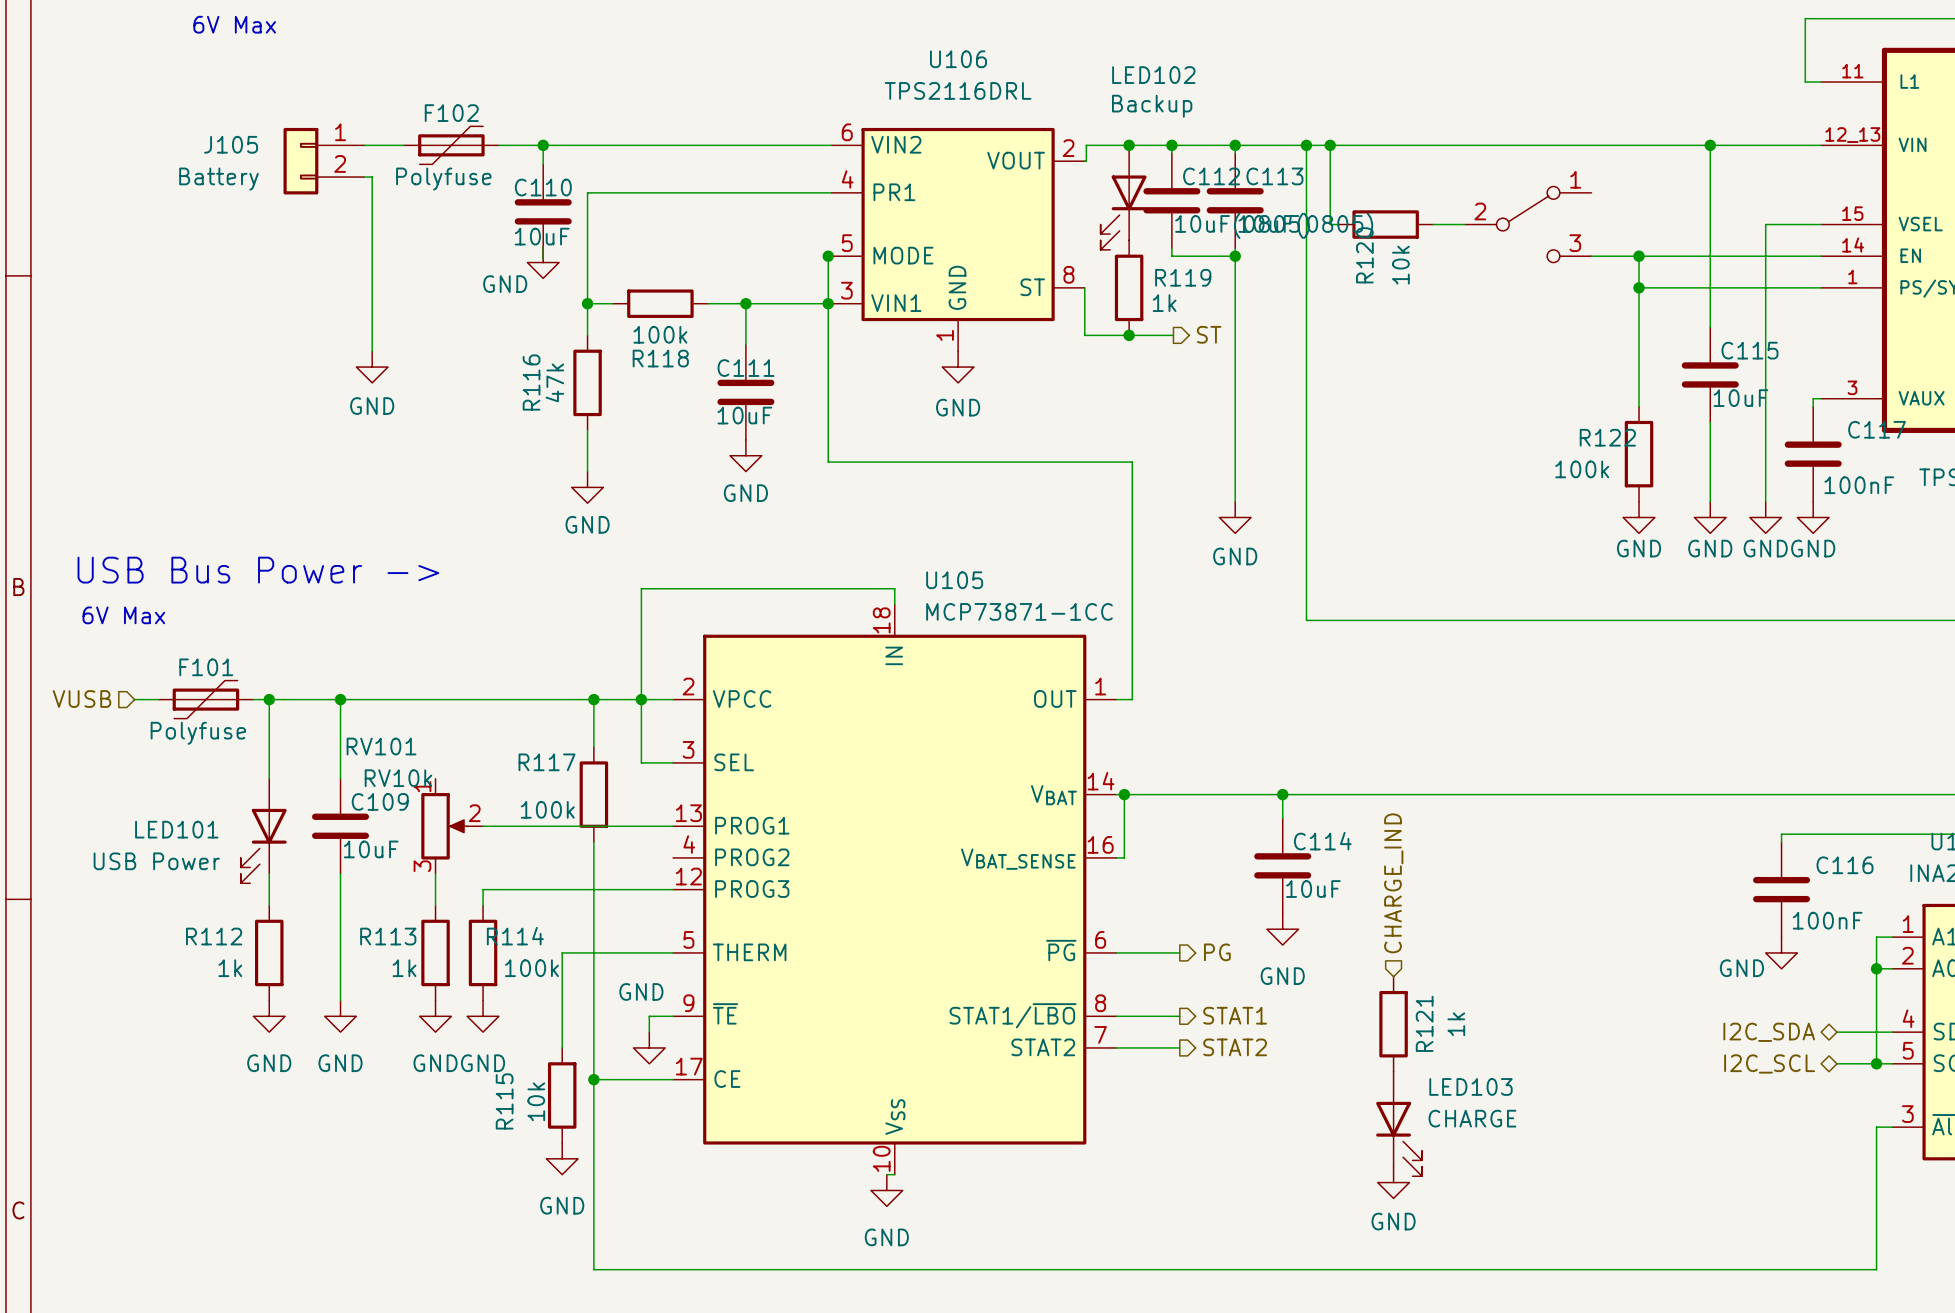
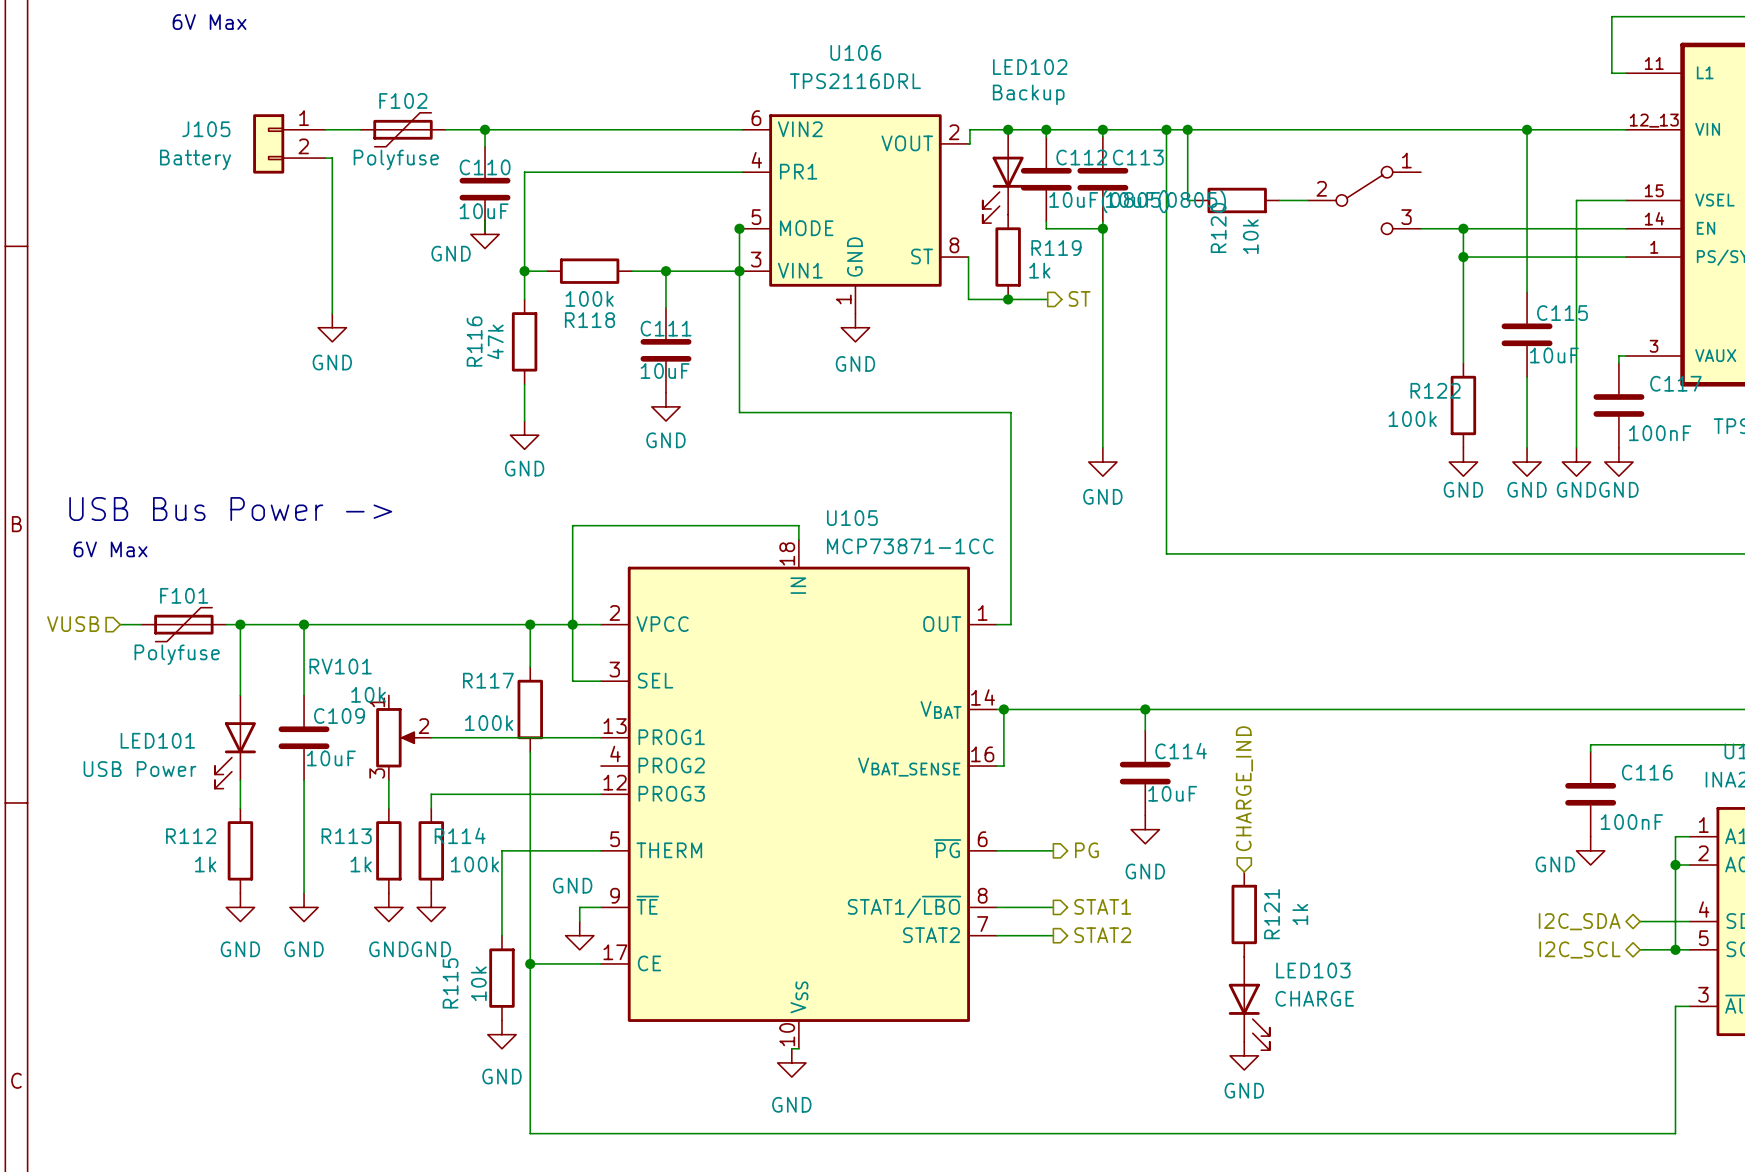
RV101 value: RV10k (398, 778) -> 10k (368, 694)

